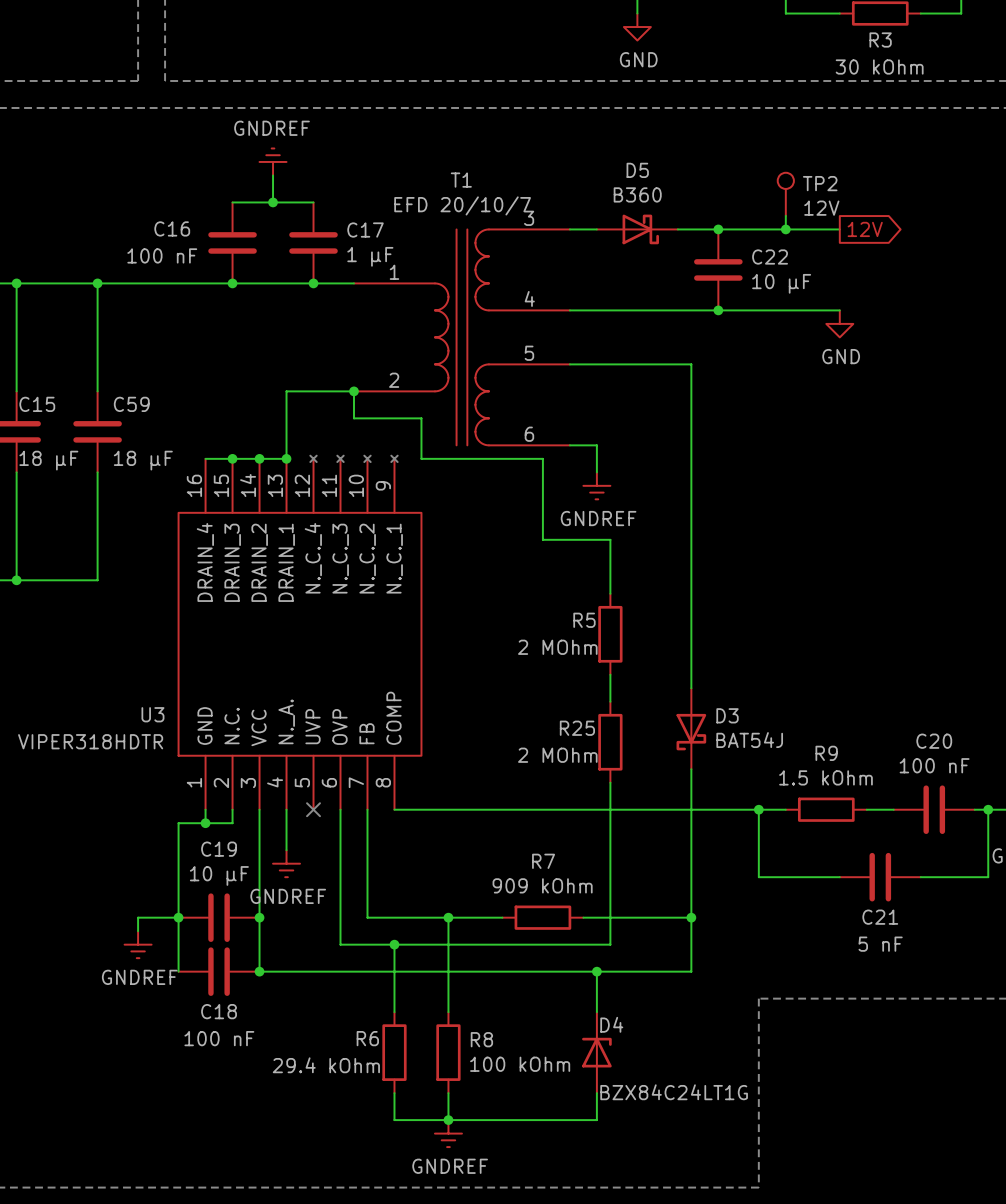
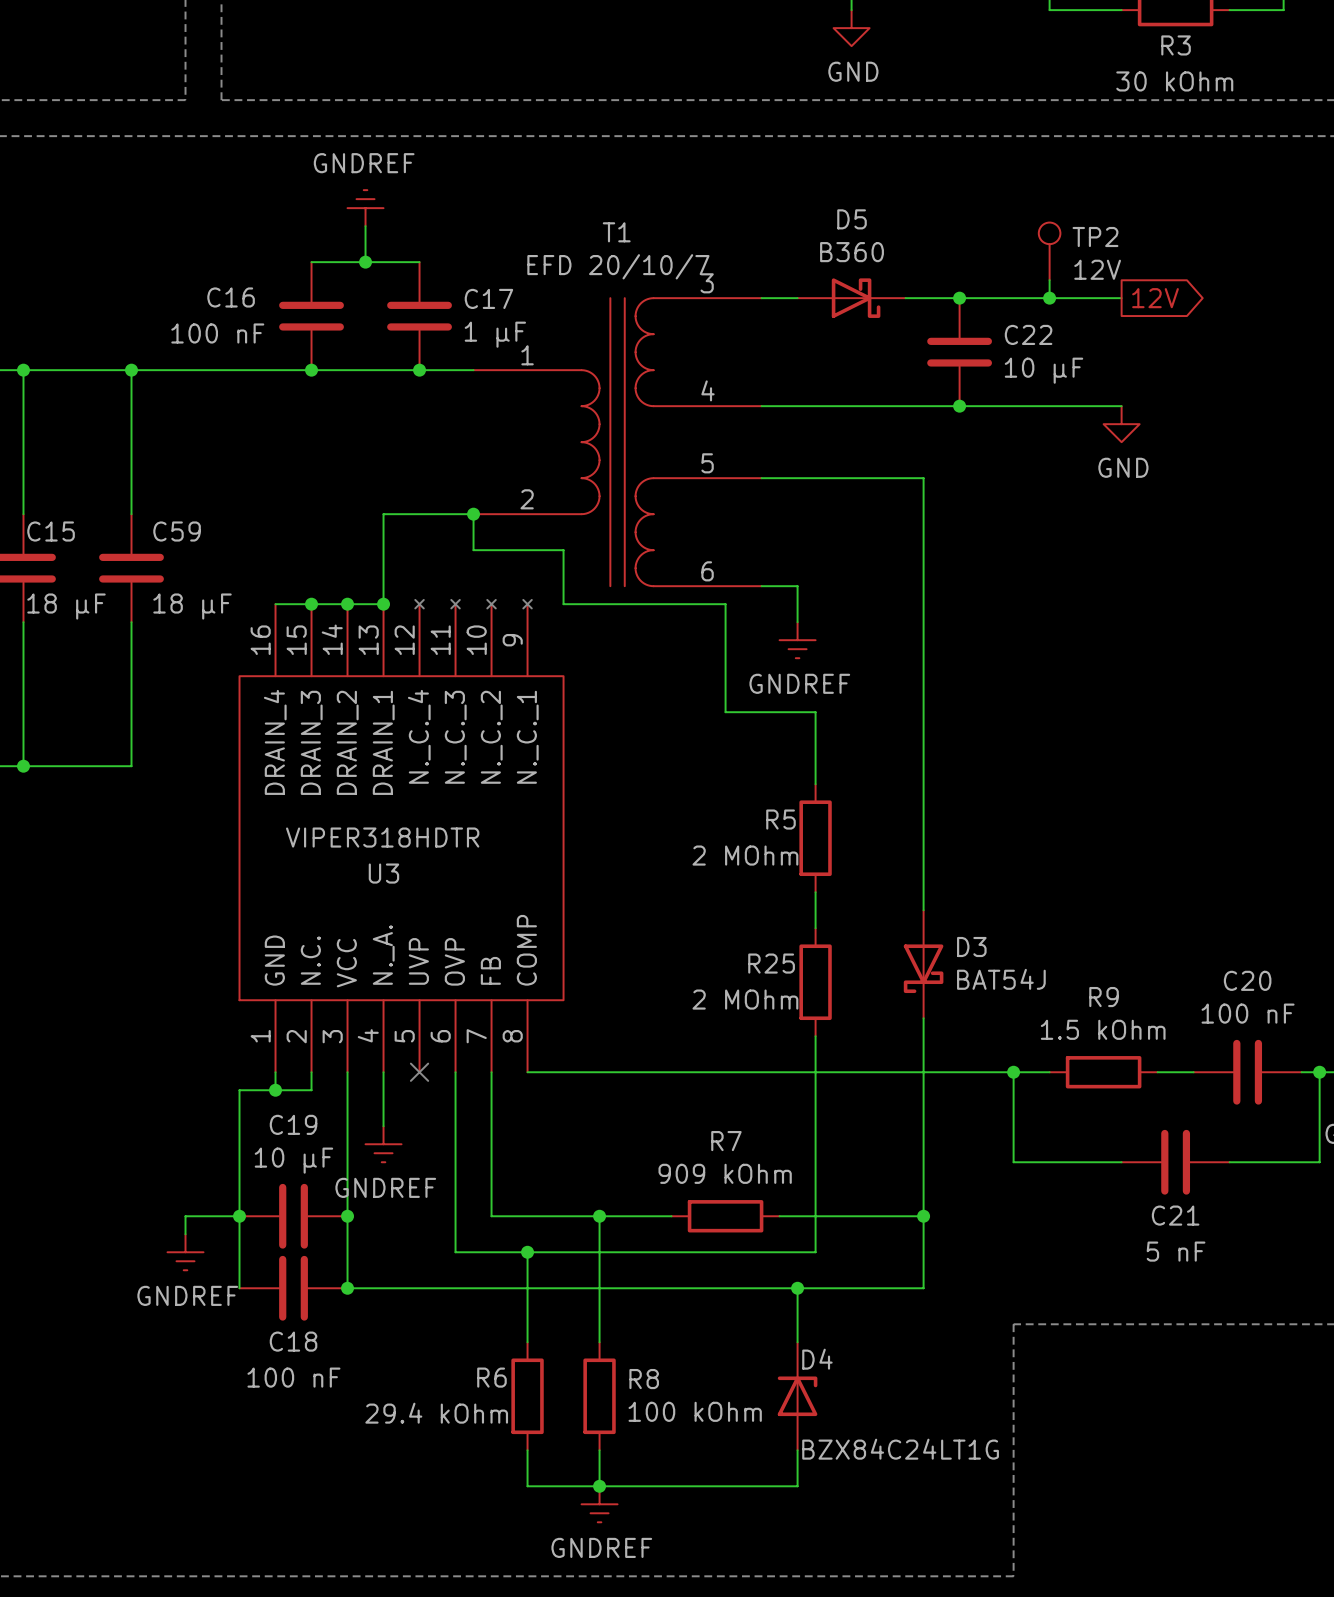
U3 name position: U3 (152, 714) -> U3 (383, 873)
U3 value position: VIPER318HDTR (90, 741) -> VIPER318HDTR (382, 837)

